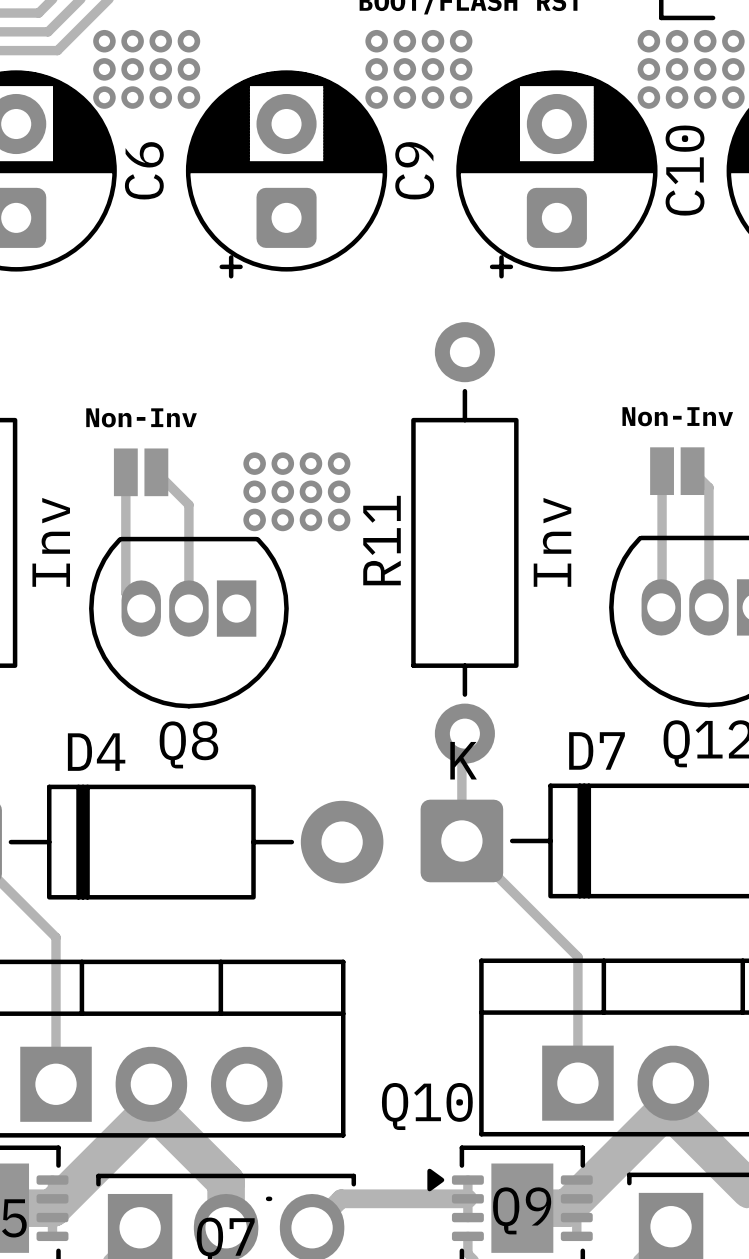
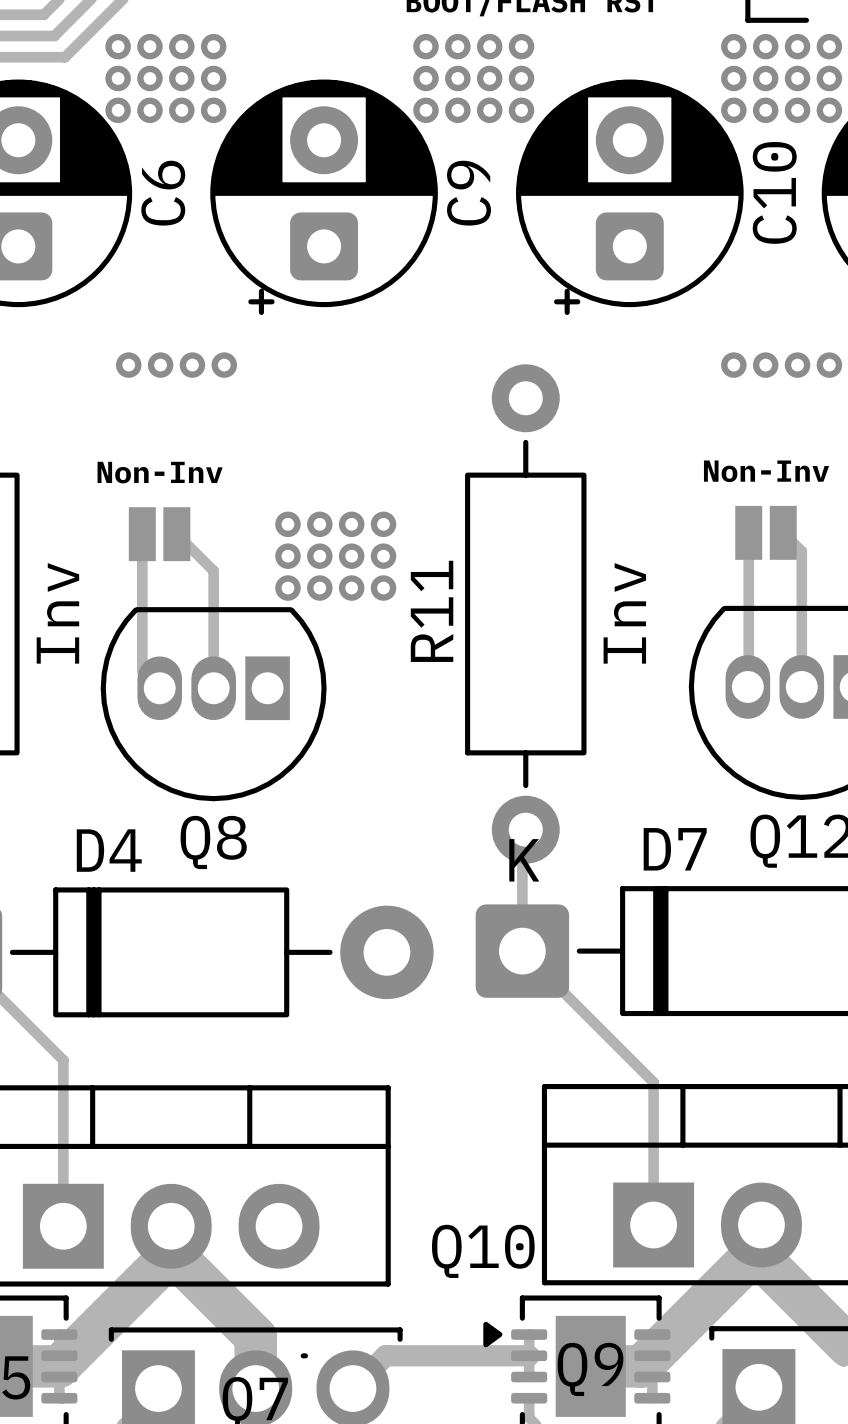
via: none -> (128, 365)
via: none -> (160, 365)
via: none -> (192, 365)
via: none -> (224, 365)
via: none -> (733, 365)
via: none -> (765, 365)
via: none -> (797, 365)
via: none -> (829, 365)

